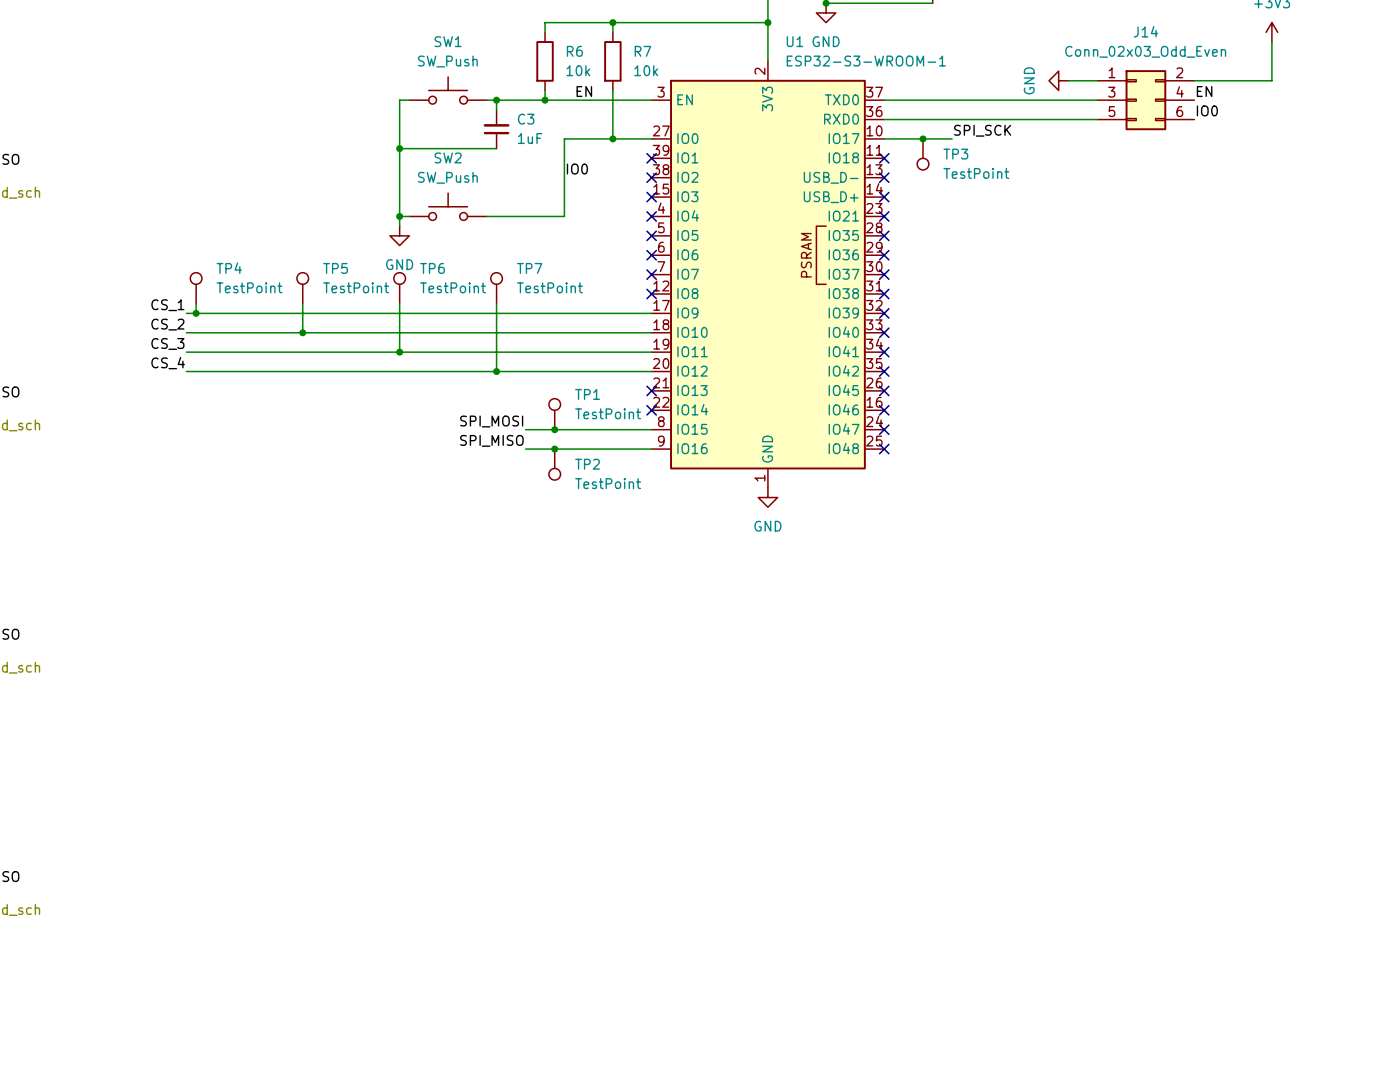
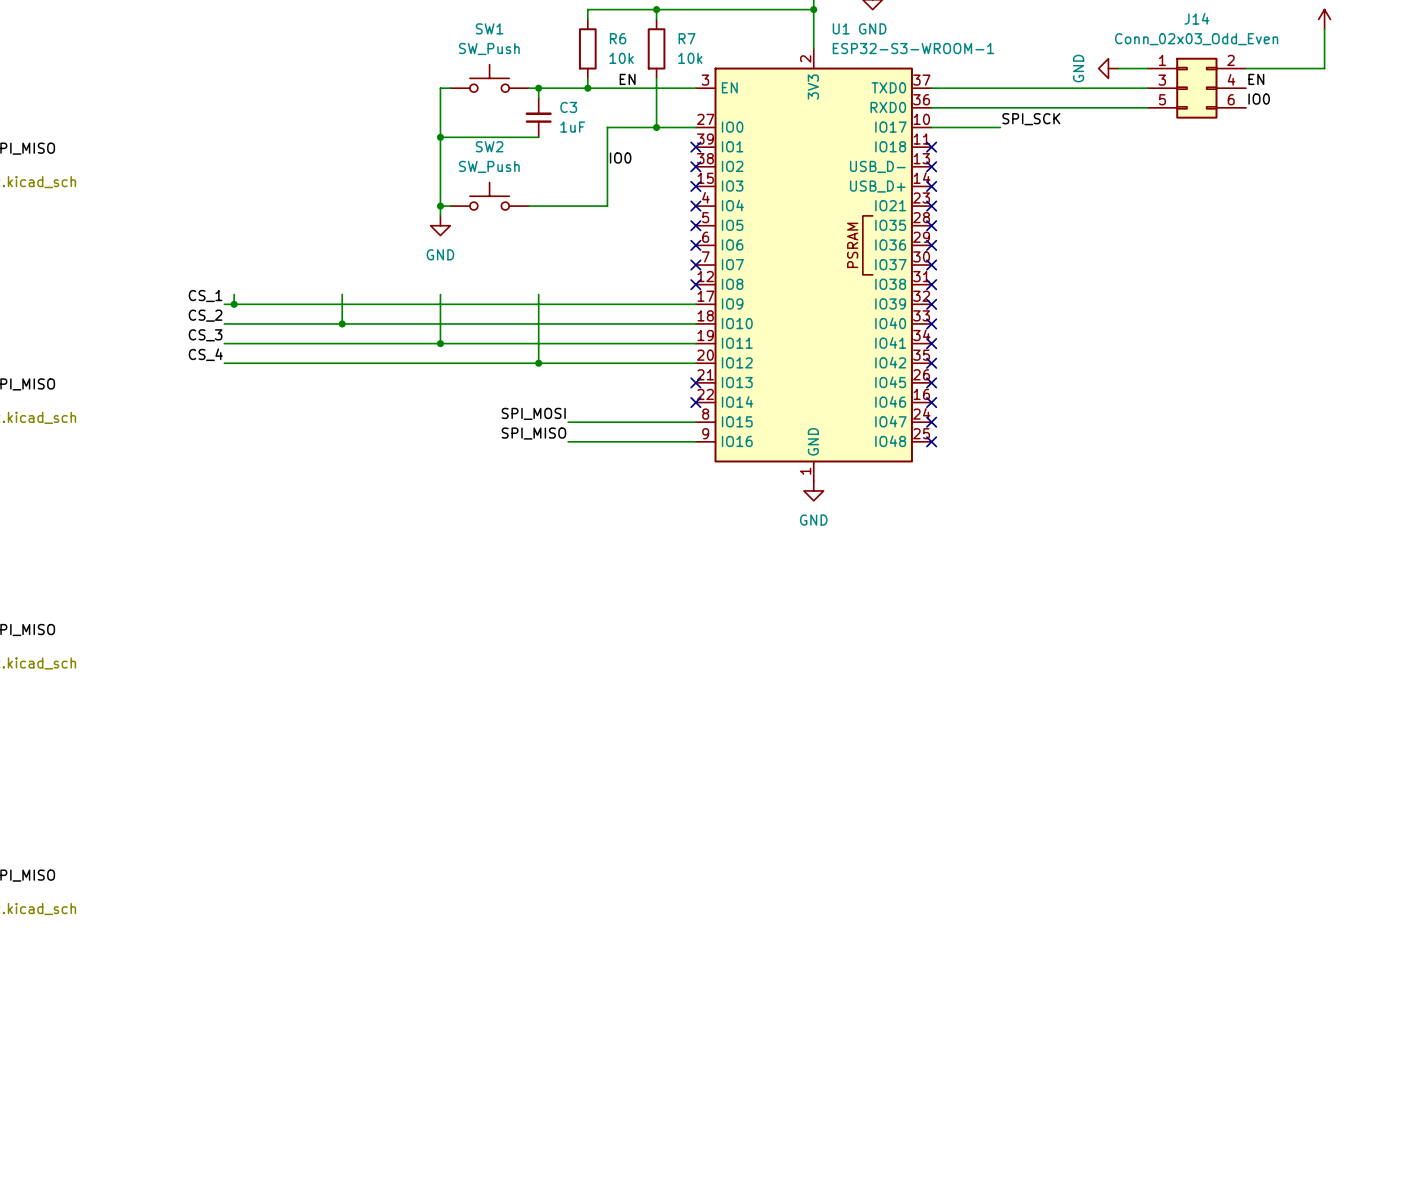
junction: (923, 138) -> none
TP3: TestPoint (923, 154) -> none
TP4: TestPoint (196, 288) -> none
TP5: TestPoint (302, 288) -> none
TP6: TestPoint (399, 288) -> none
TP7: TestPoint (496, 288) -> none
TP1: TestPoint (554, 414) -> none
junction: (554, 429) -> none
junction: (554, 449) -> none
TP2: TestPoint (554, 464) -> none

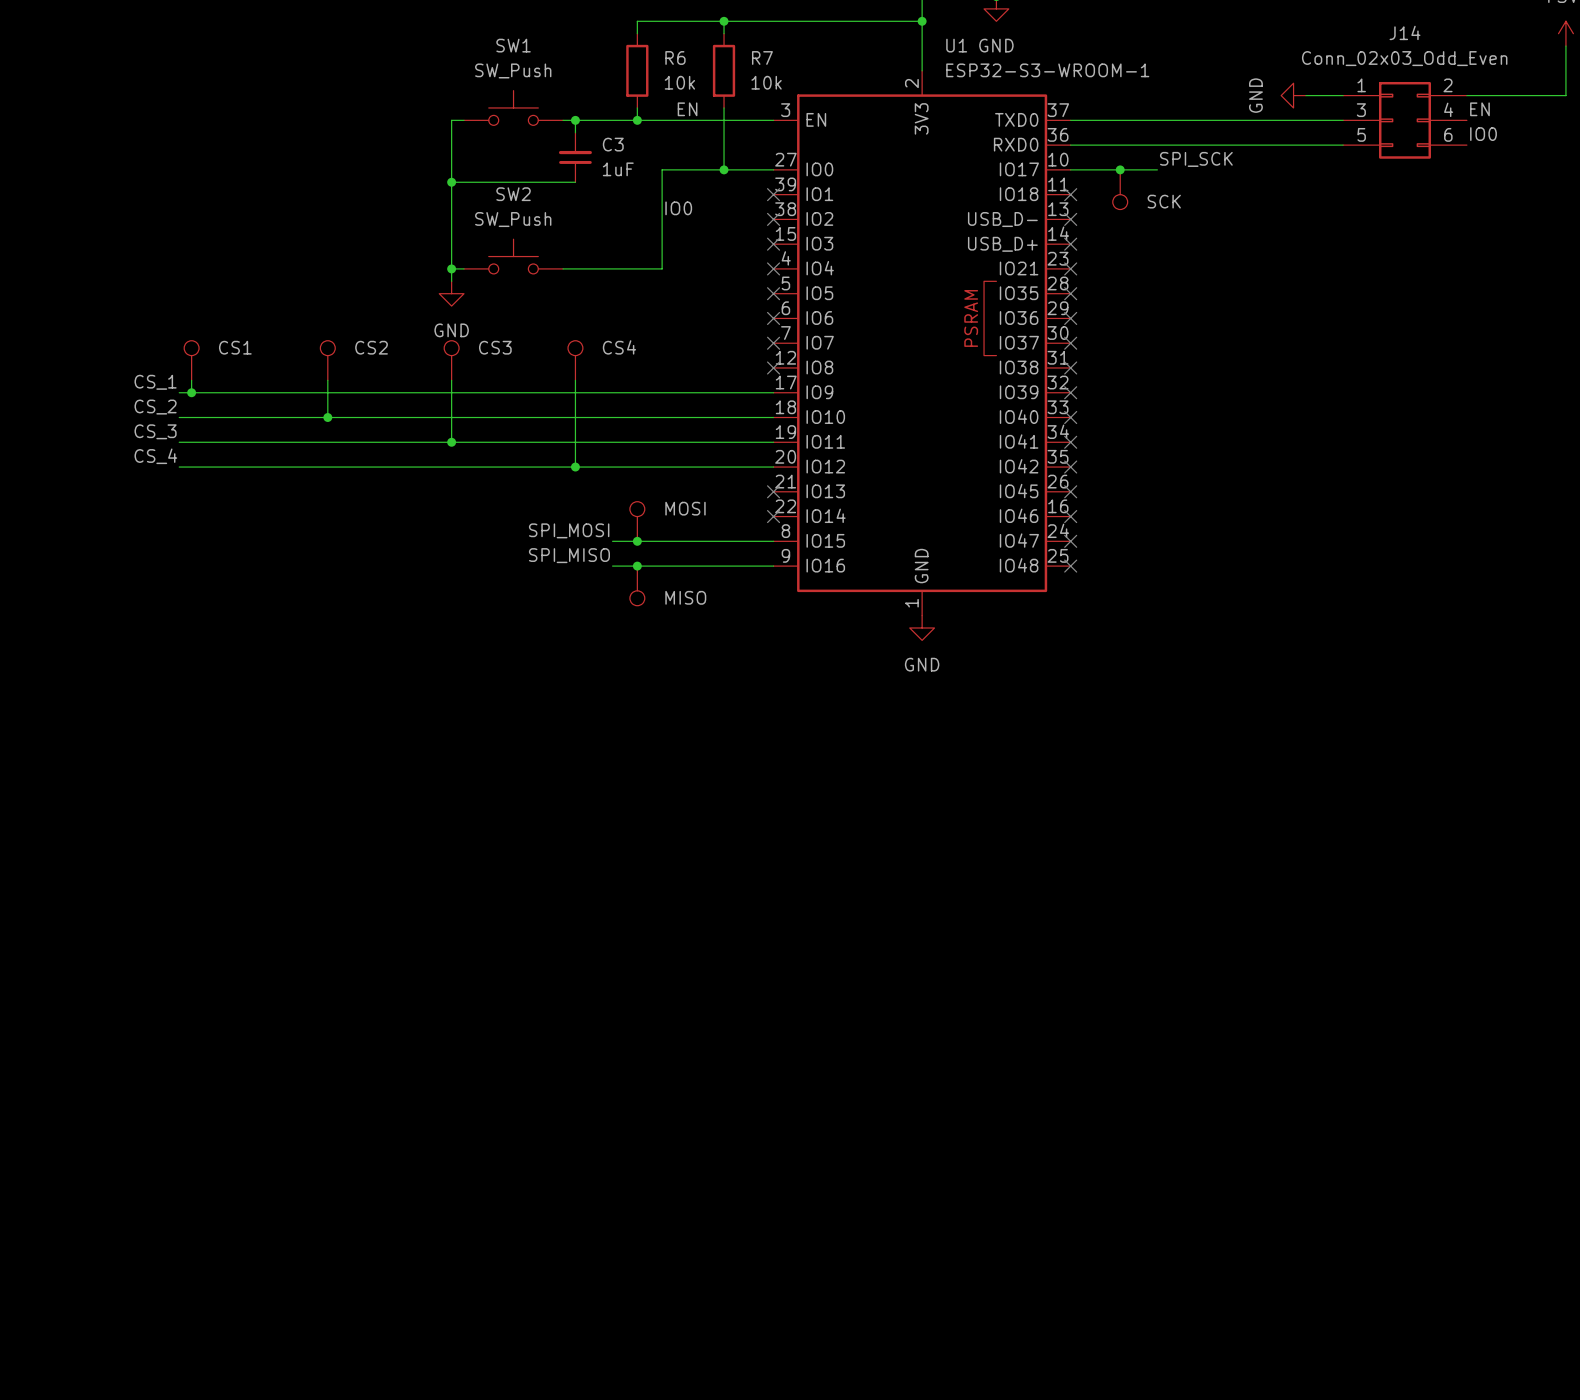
junction: none -> (1120, 169)
part: none -> SCK (1120, 189)
part: none -> CS1 (191, 360)
part: none -> CS2 (327, 360)
part: none -> CS3 (451, 360)
part: none -> CS4 (575, 360)
part: none -> MOSI (637, 521)
junction: none -> (637, 541)
junction: none -> (637, 566)
part: none -> MISO (637, 585)

